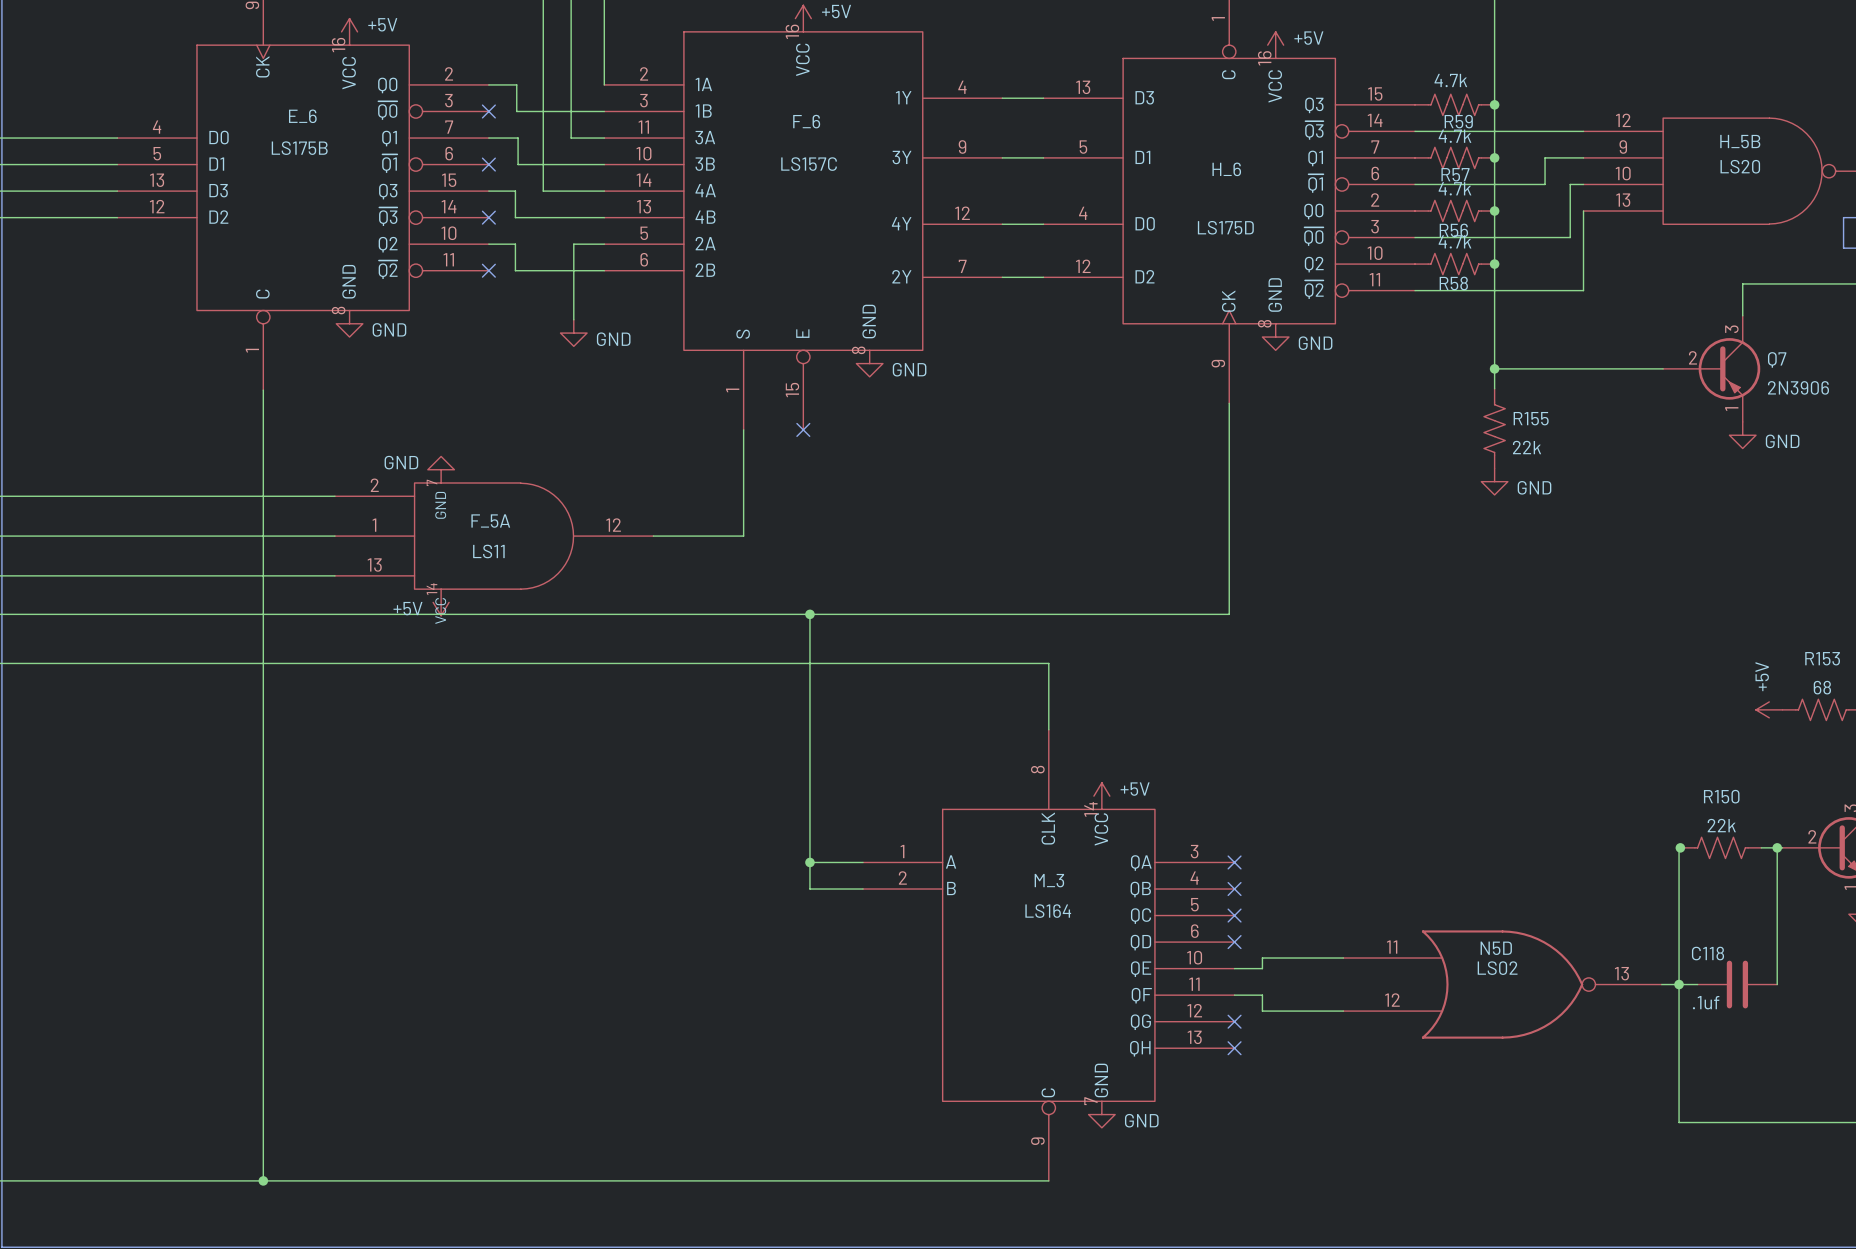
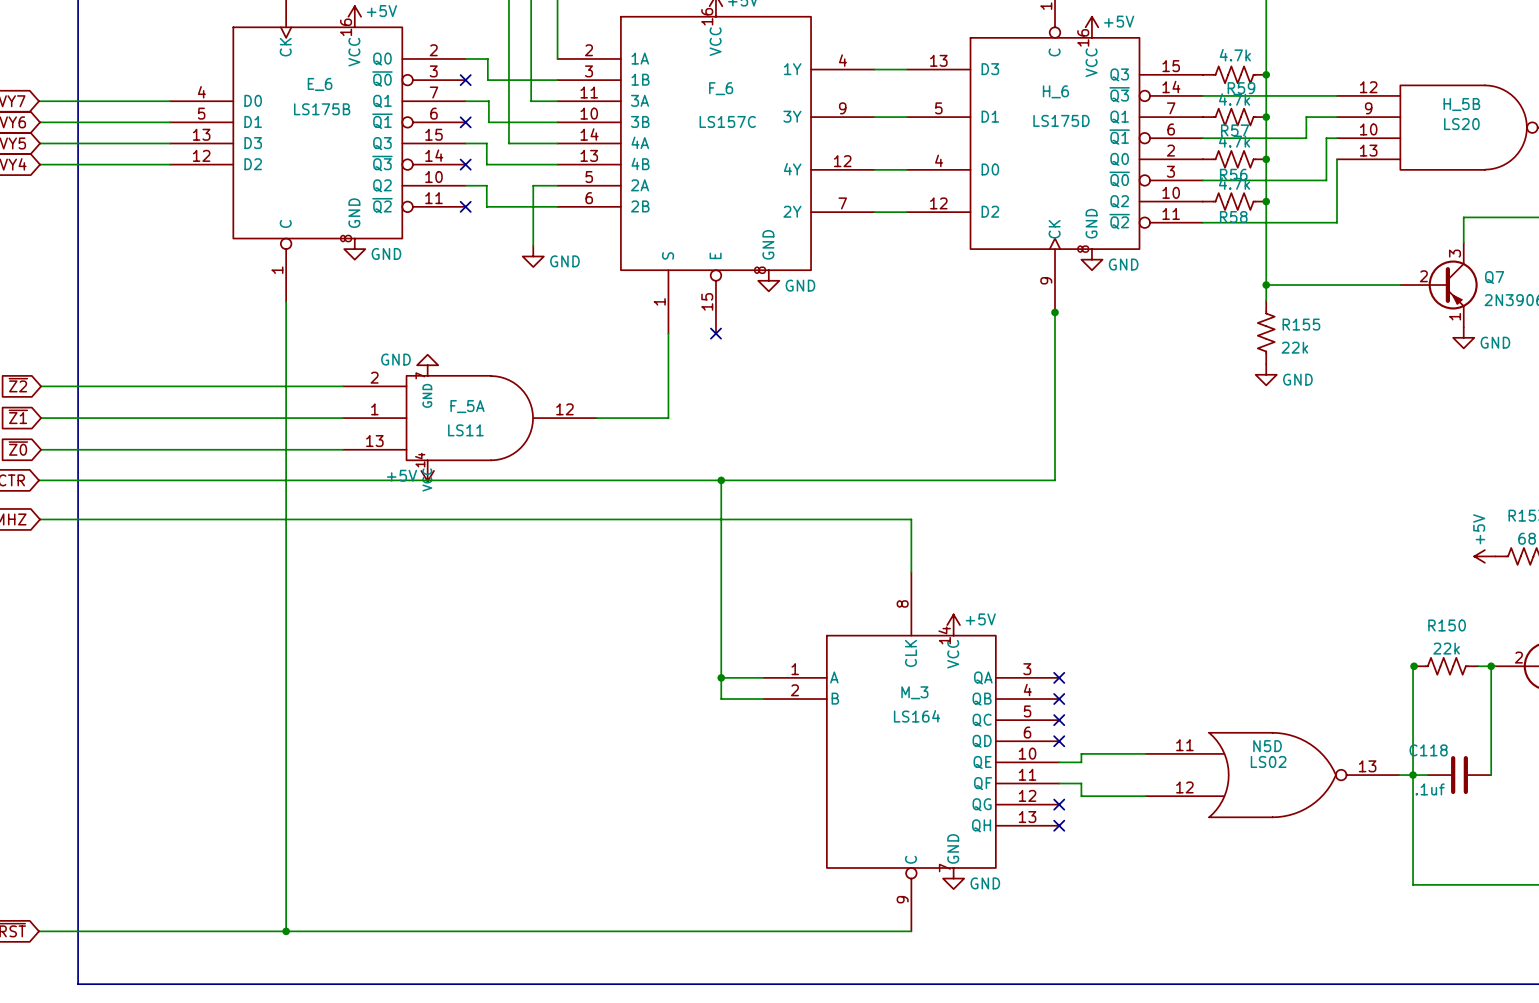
H_6 name position: H_6 (1226, 169) -> H_6 (1055, 91)
H_6 value position: LS175D (1225, 227) -> LS175D (1061, 120)
junction: none -> (1055, 312)

